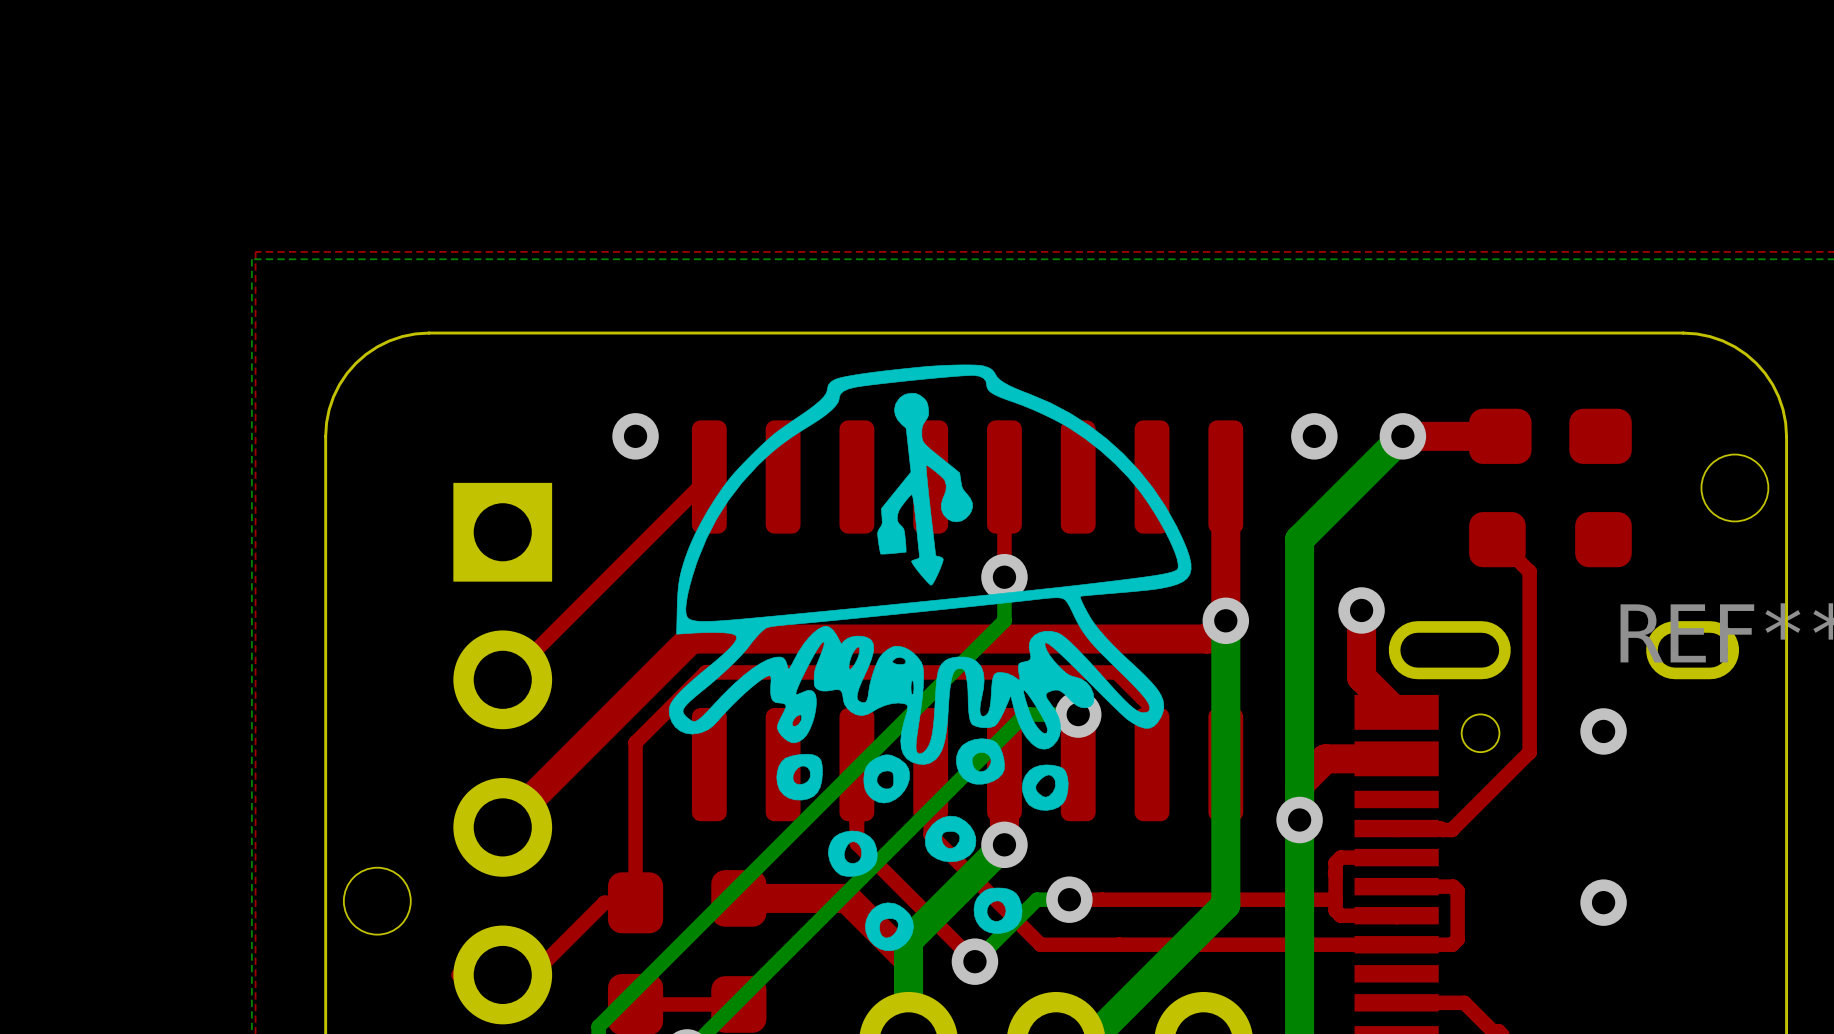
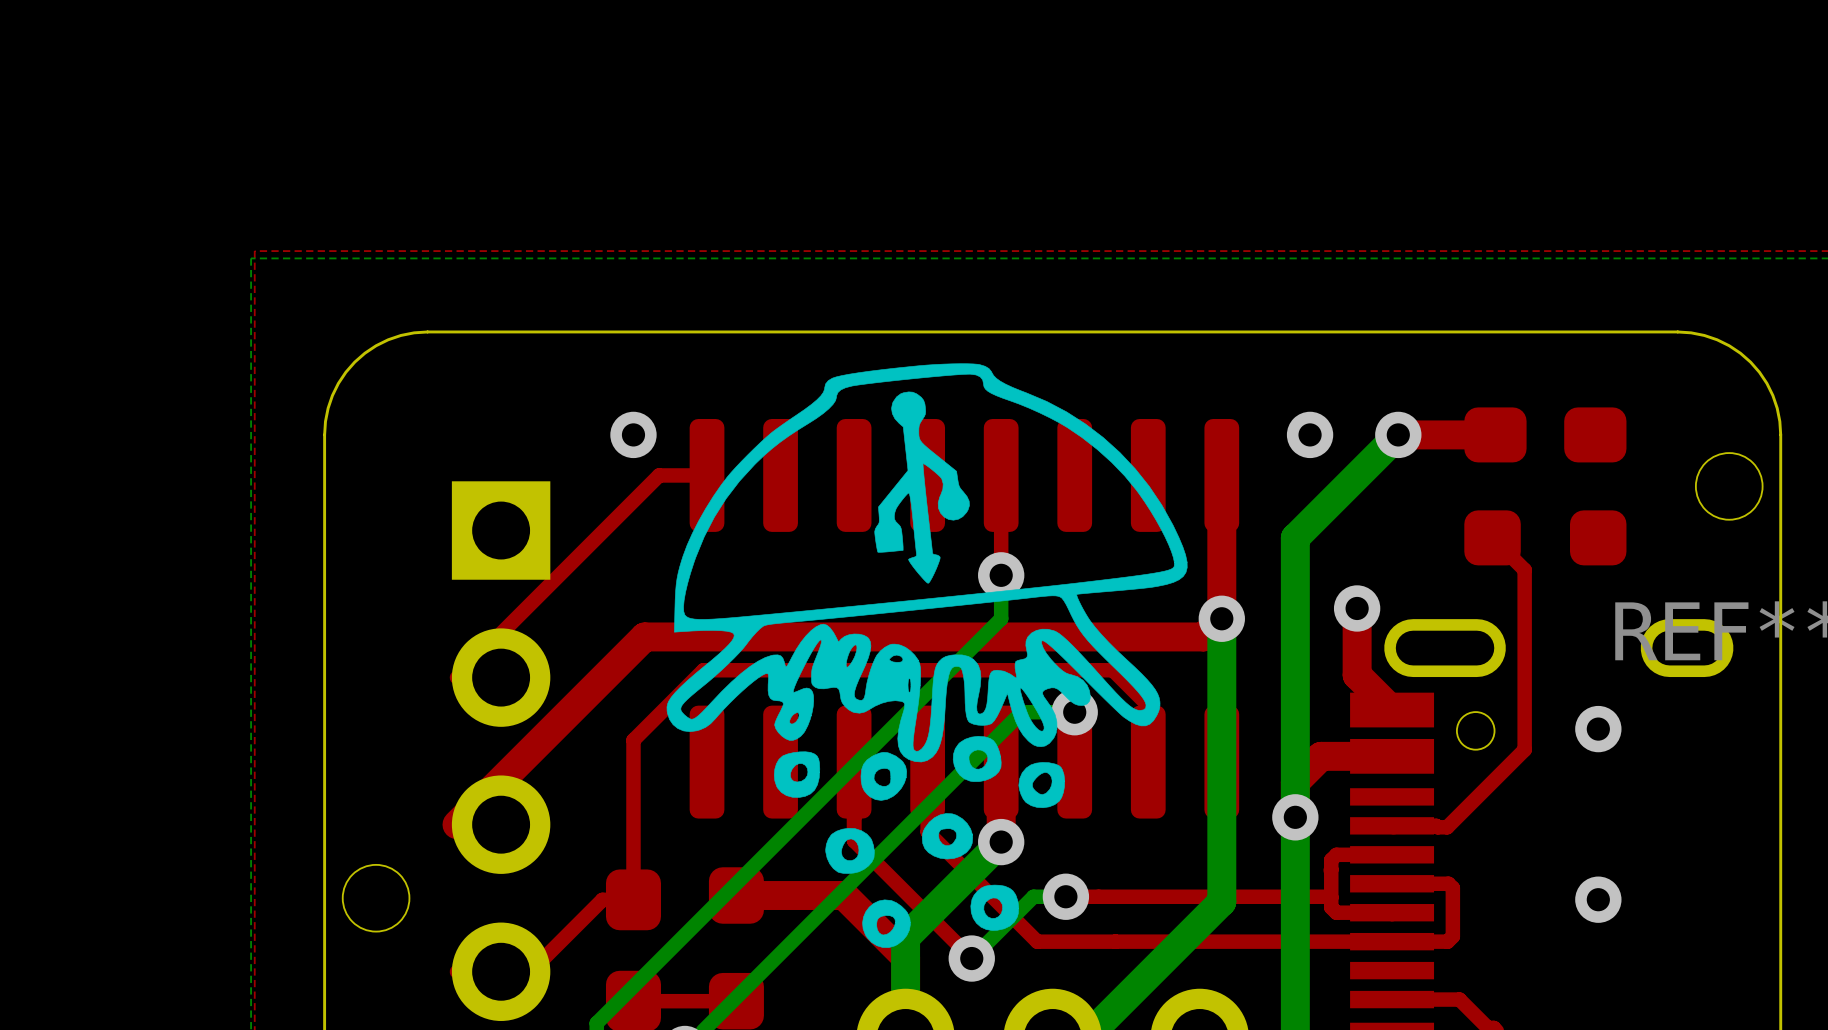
top track: (709, 477) (506, 679) (502, 679) -> (707, 475) (659, 475) (456, 677)
top track: (691, 639) (502, 827) -> (688, 636) (644, 636) (456, 824)

